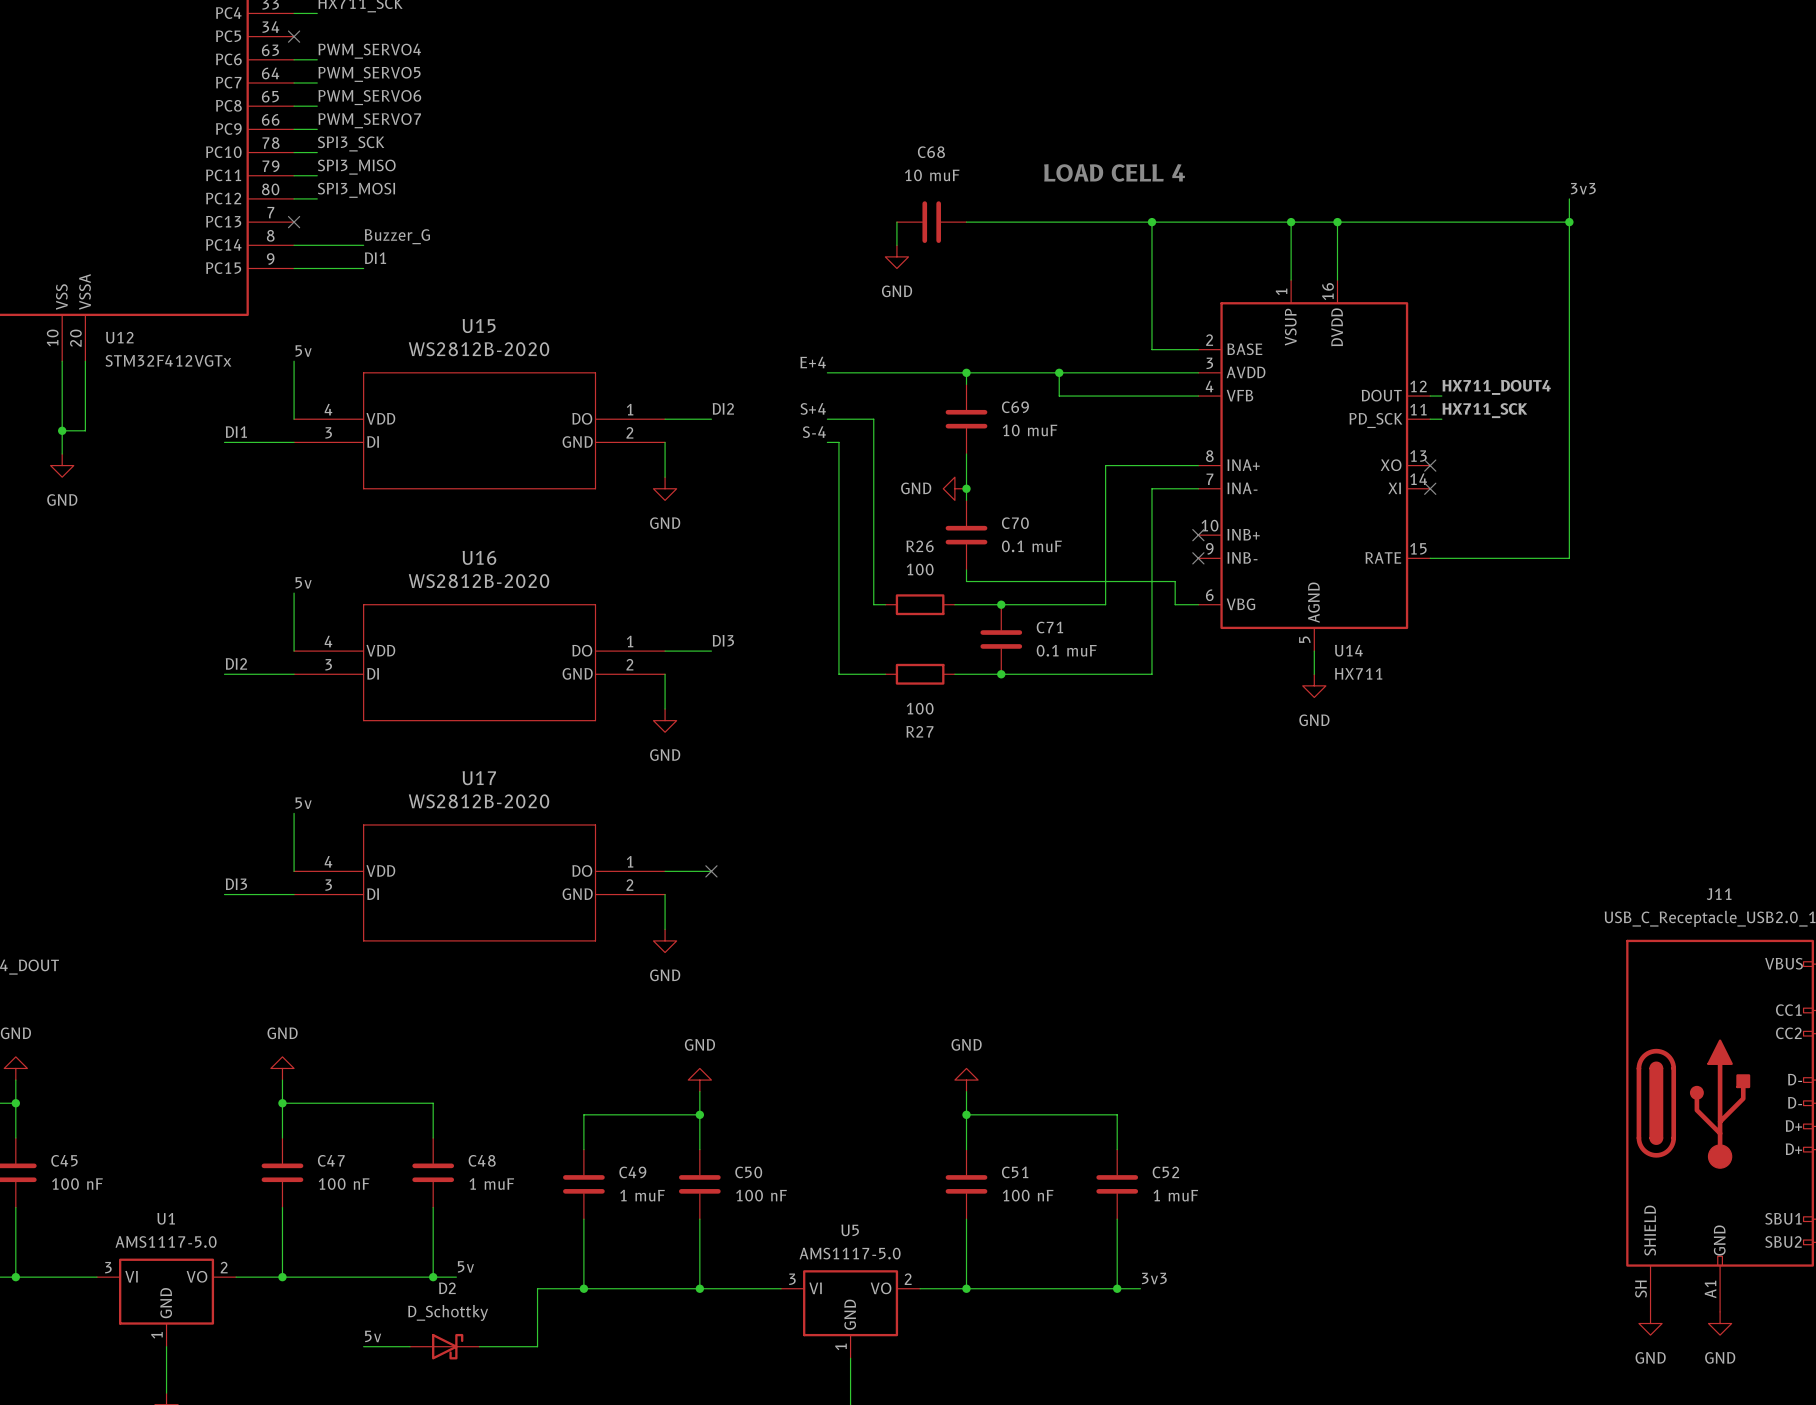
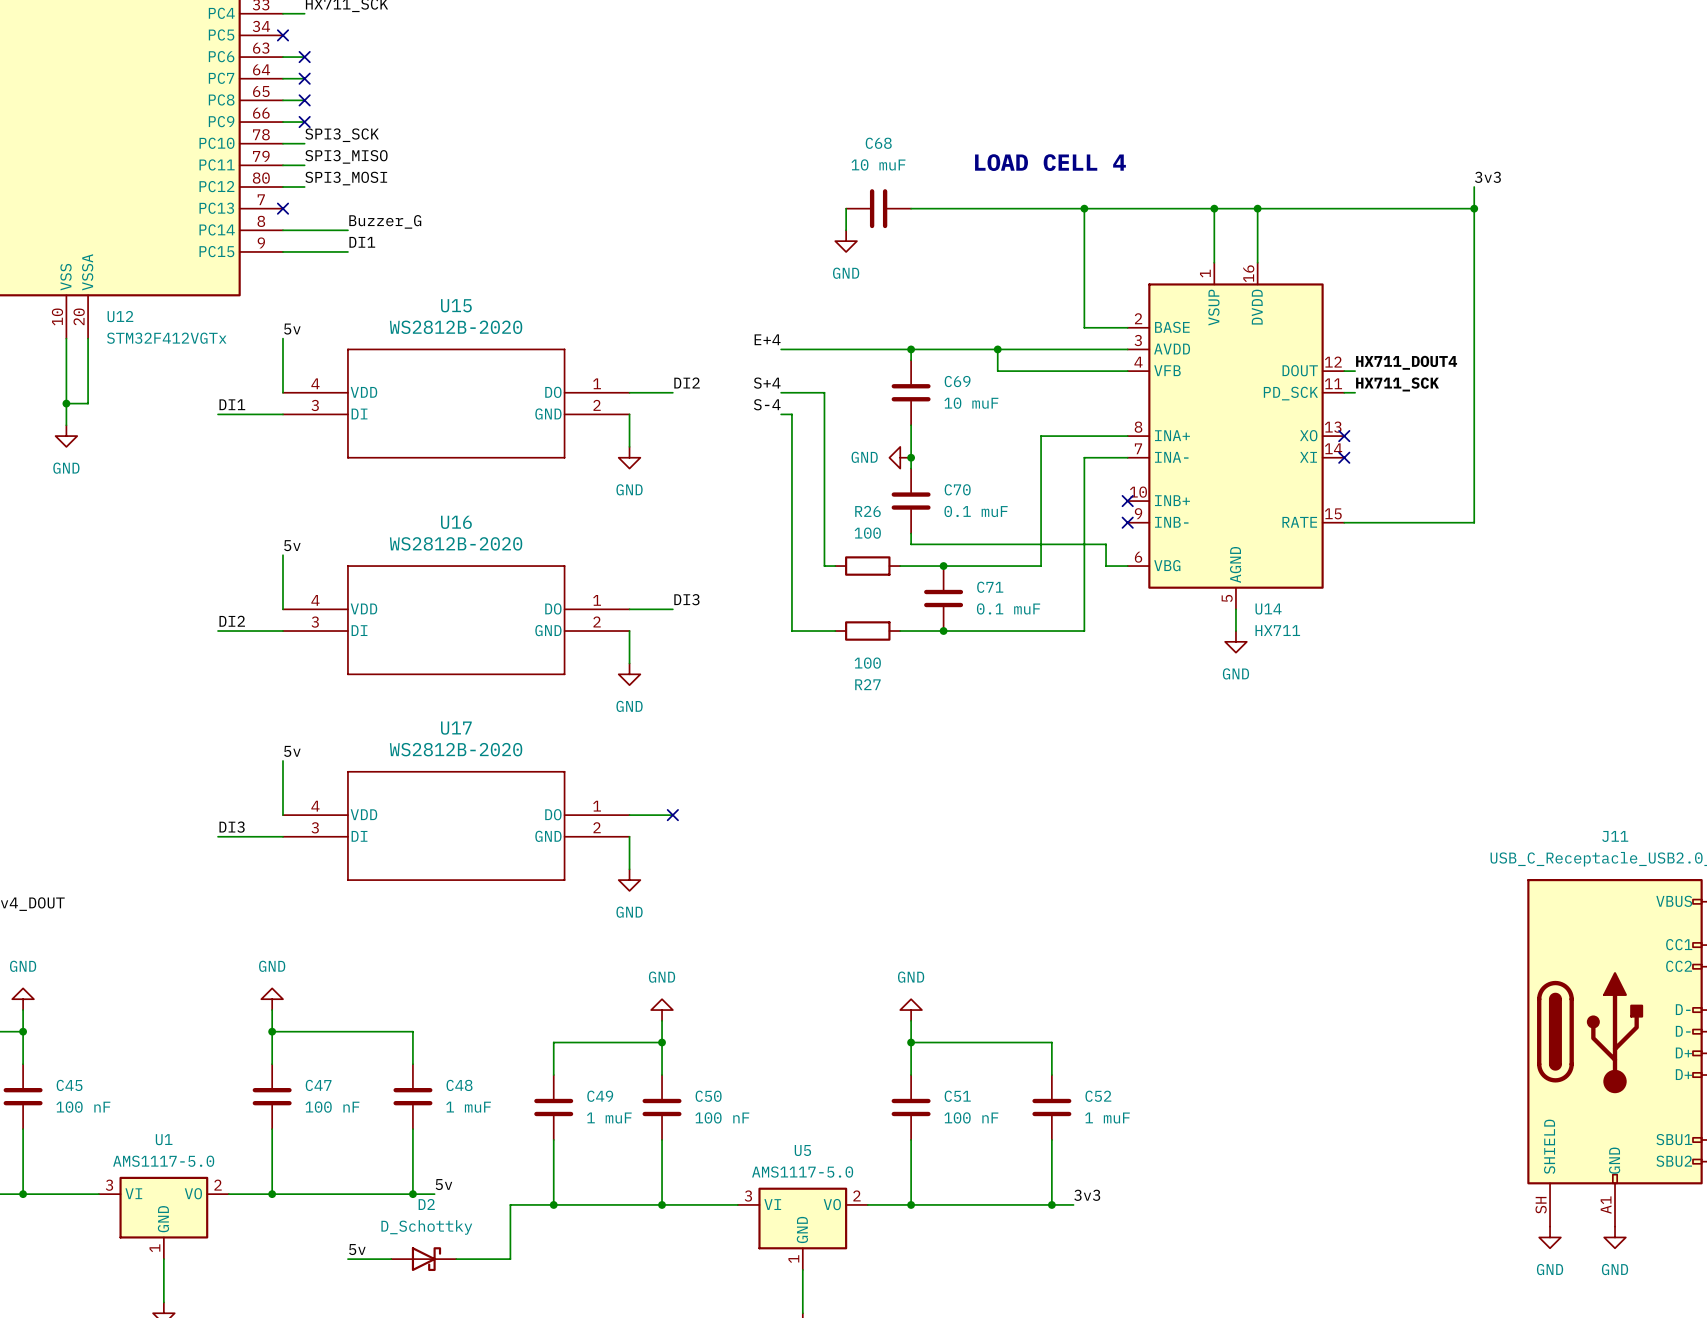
label: PWM_SERVO4 (369, 51) -> none
no-connect mark: none -> (304, 57)
label: PWM_SERVO5 (369, 74) -> none
no-connect mark: none -> (304, 78)
label: PWM_SERVO6 (369, 97) -> none
no-connect mark: none -> (304, 100)
label: PWM_SERVO7 (369, 120) -> none
no-connect mark: none -> (304, 122)

